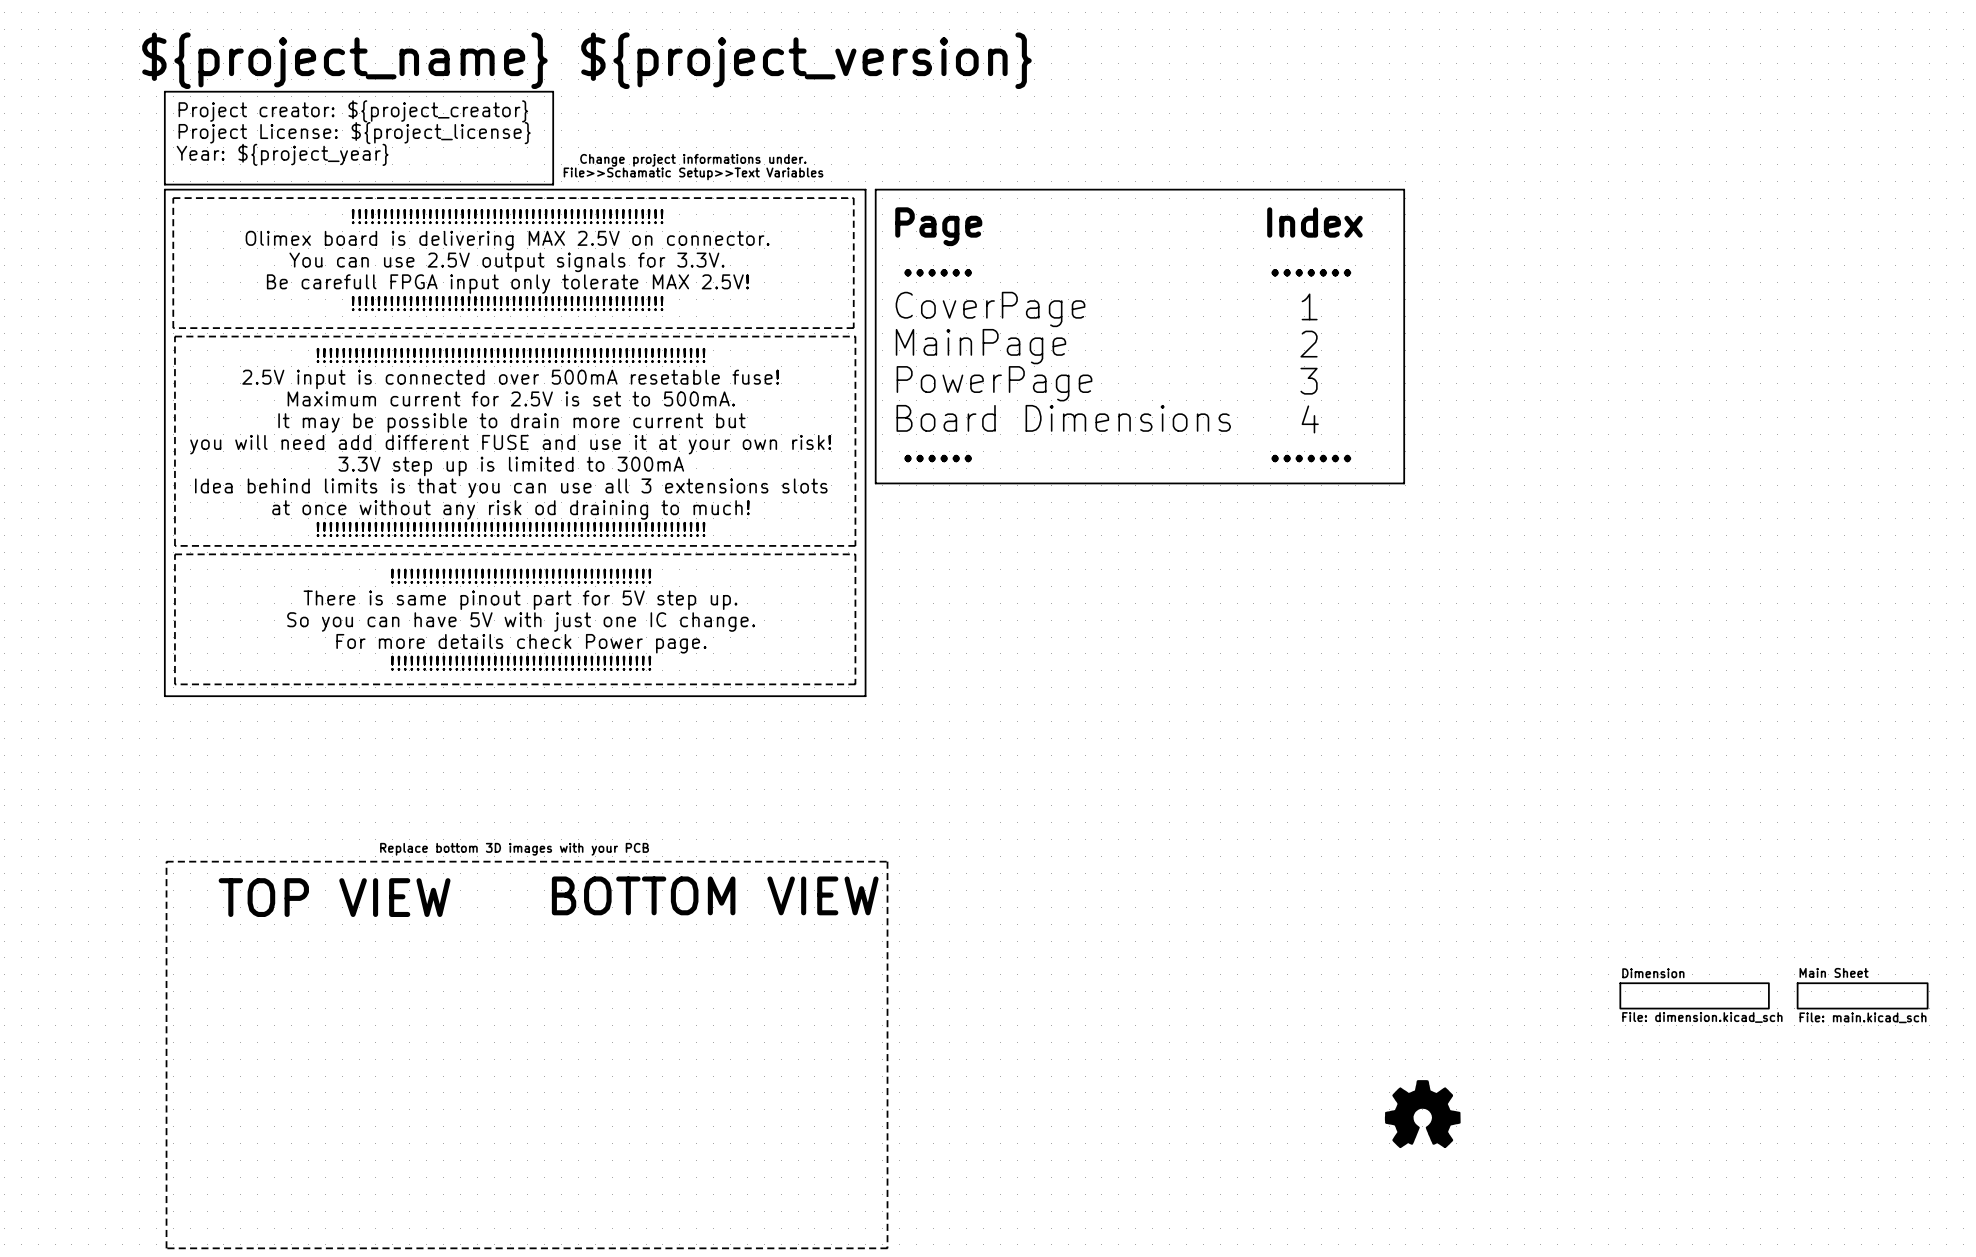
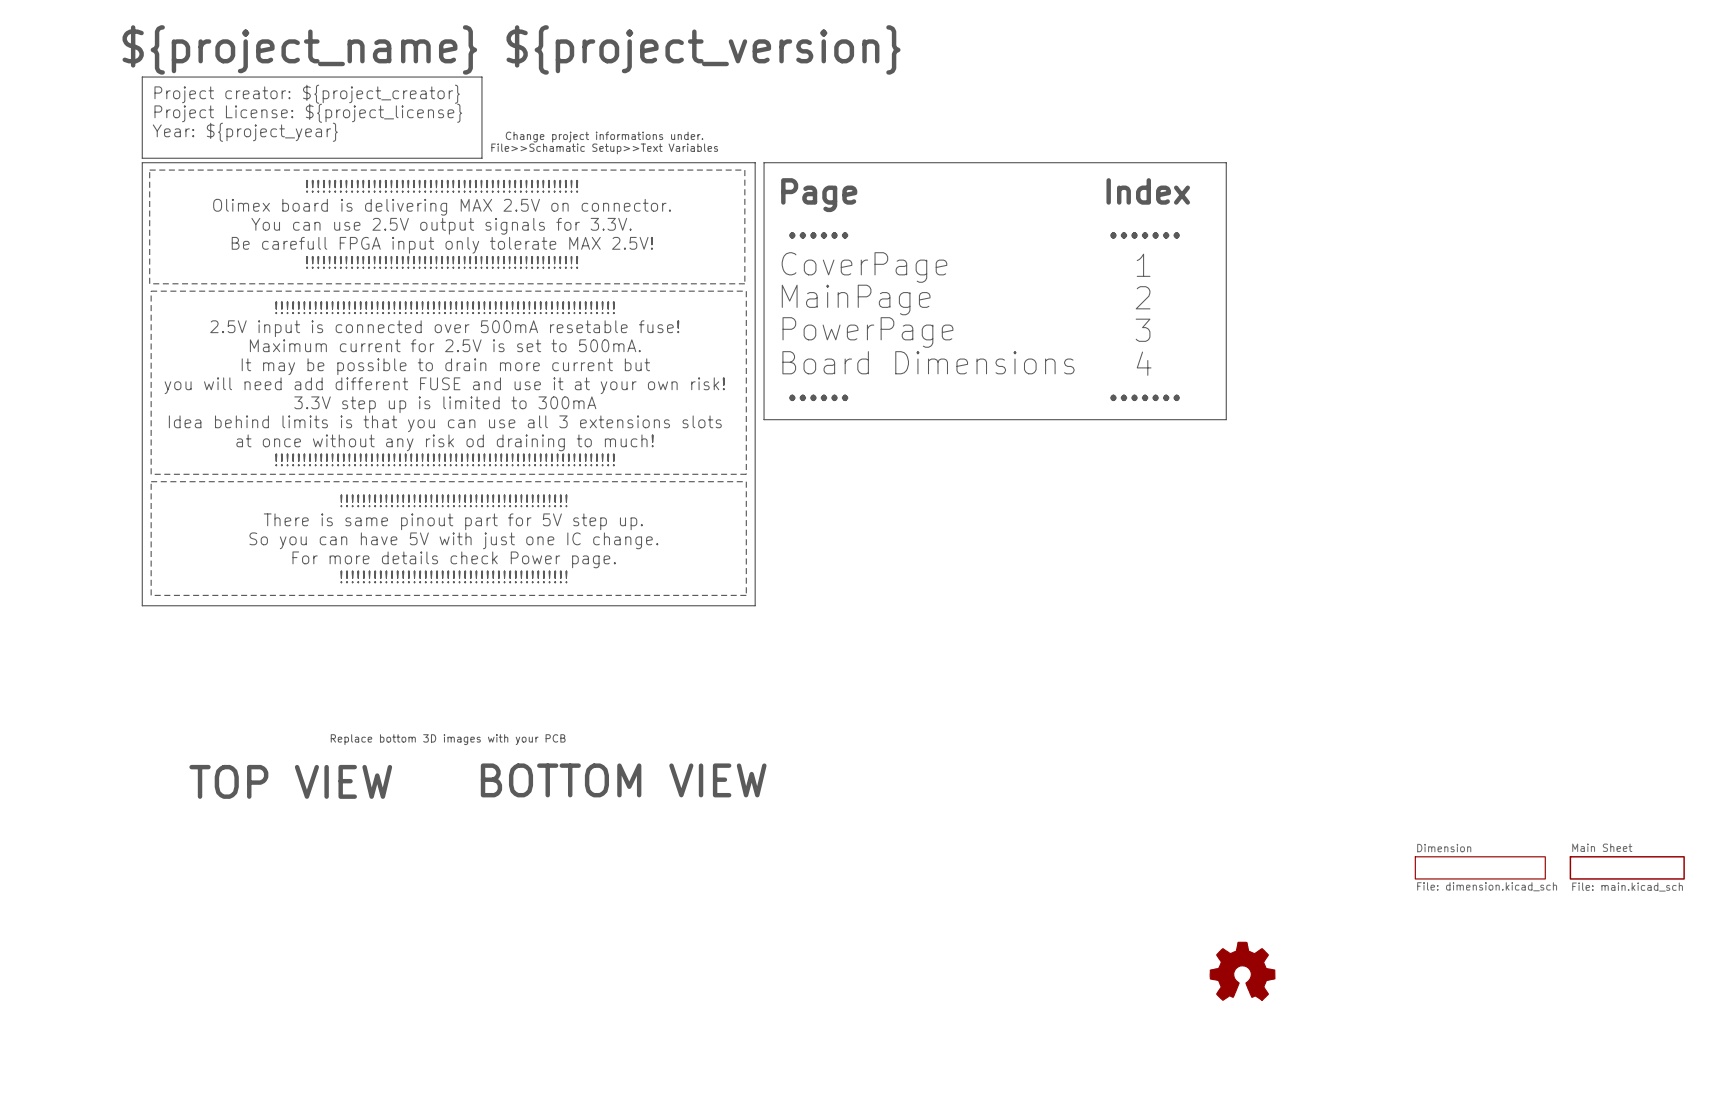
line: (166, 861) (887, 861) (887, 1248) (166, 1248) (166, 861) -> none

